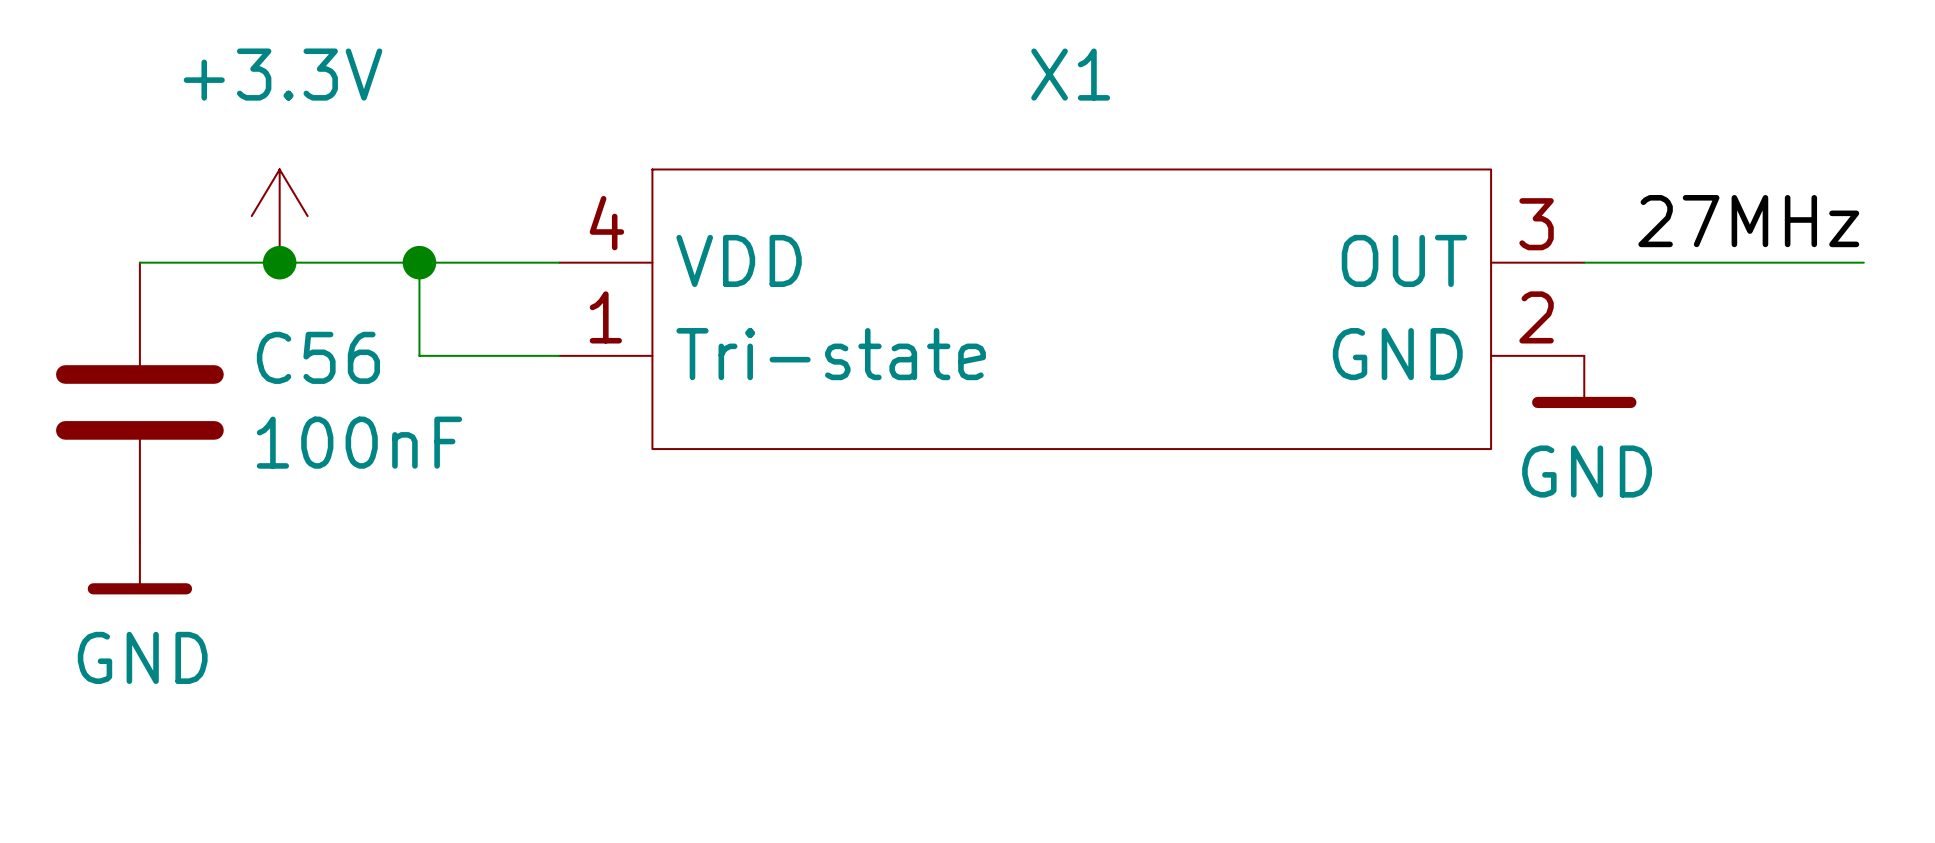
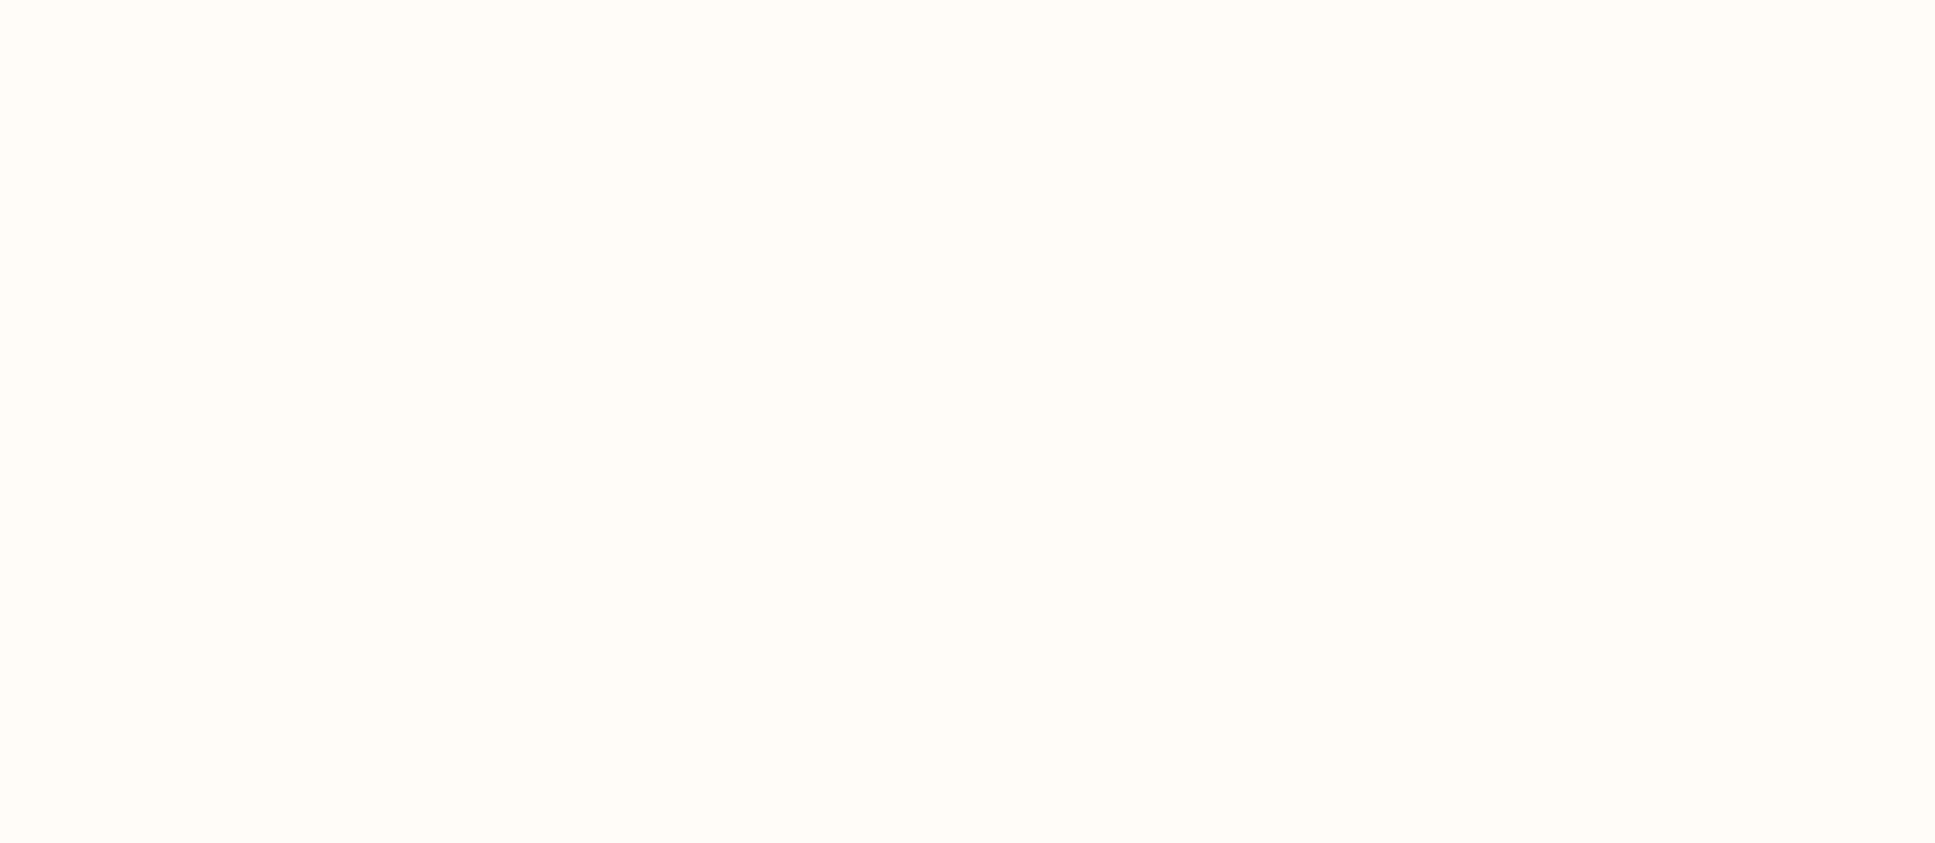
power symbol: +3.3V (279, 216) -> none
label: 27MHz (1748, 221) -> none
wire: (139, 262) (559, 262) -> none
junction: (279, 262) -> none
wire: (419, 262) (419, 355) (559, 355) -> none
junction: (419, 262) -> none
wire: (1584, 262) (1863, 262) -> none
X1: (1071, 309) -> none
power symbol: GND (1584, 381) -> none
C56: 100nF (139, 402) -> none
power symbol: GND (139, 568) -> none

